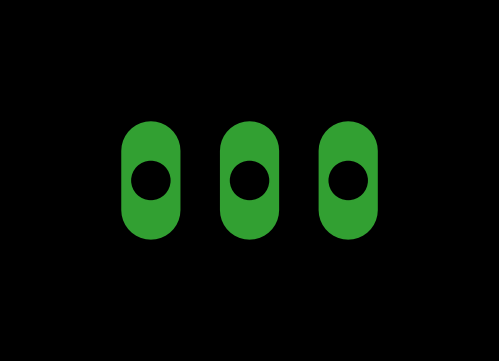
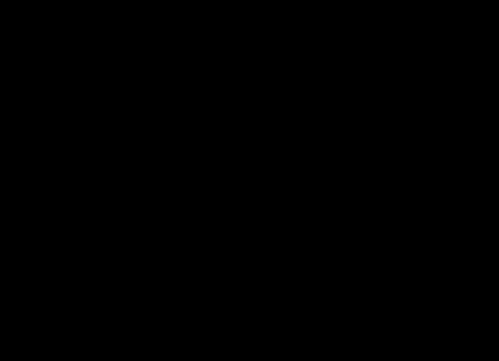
part: (249, 180) -> none

